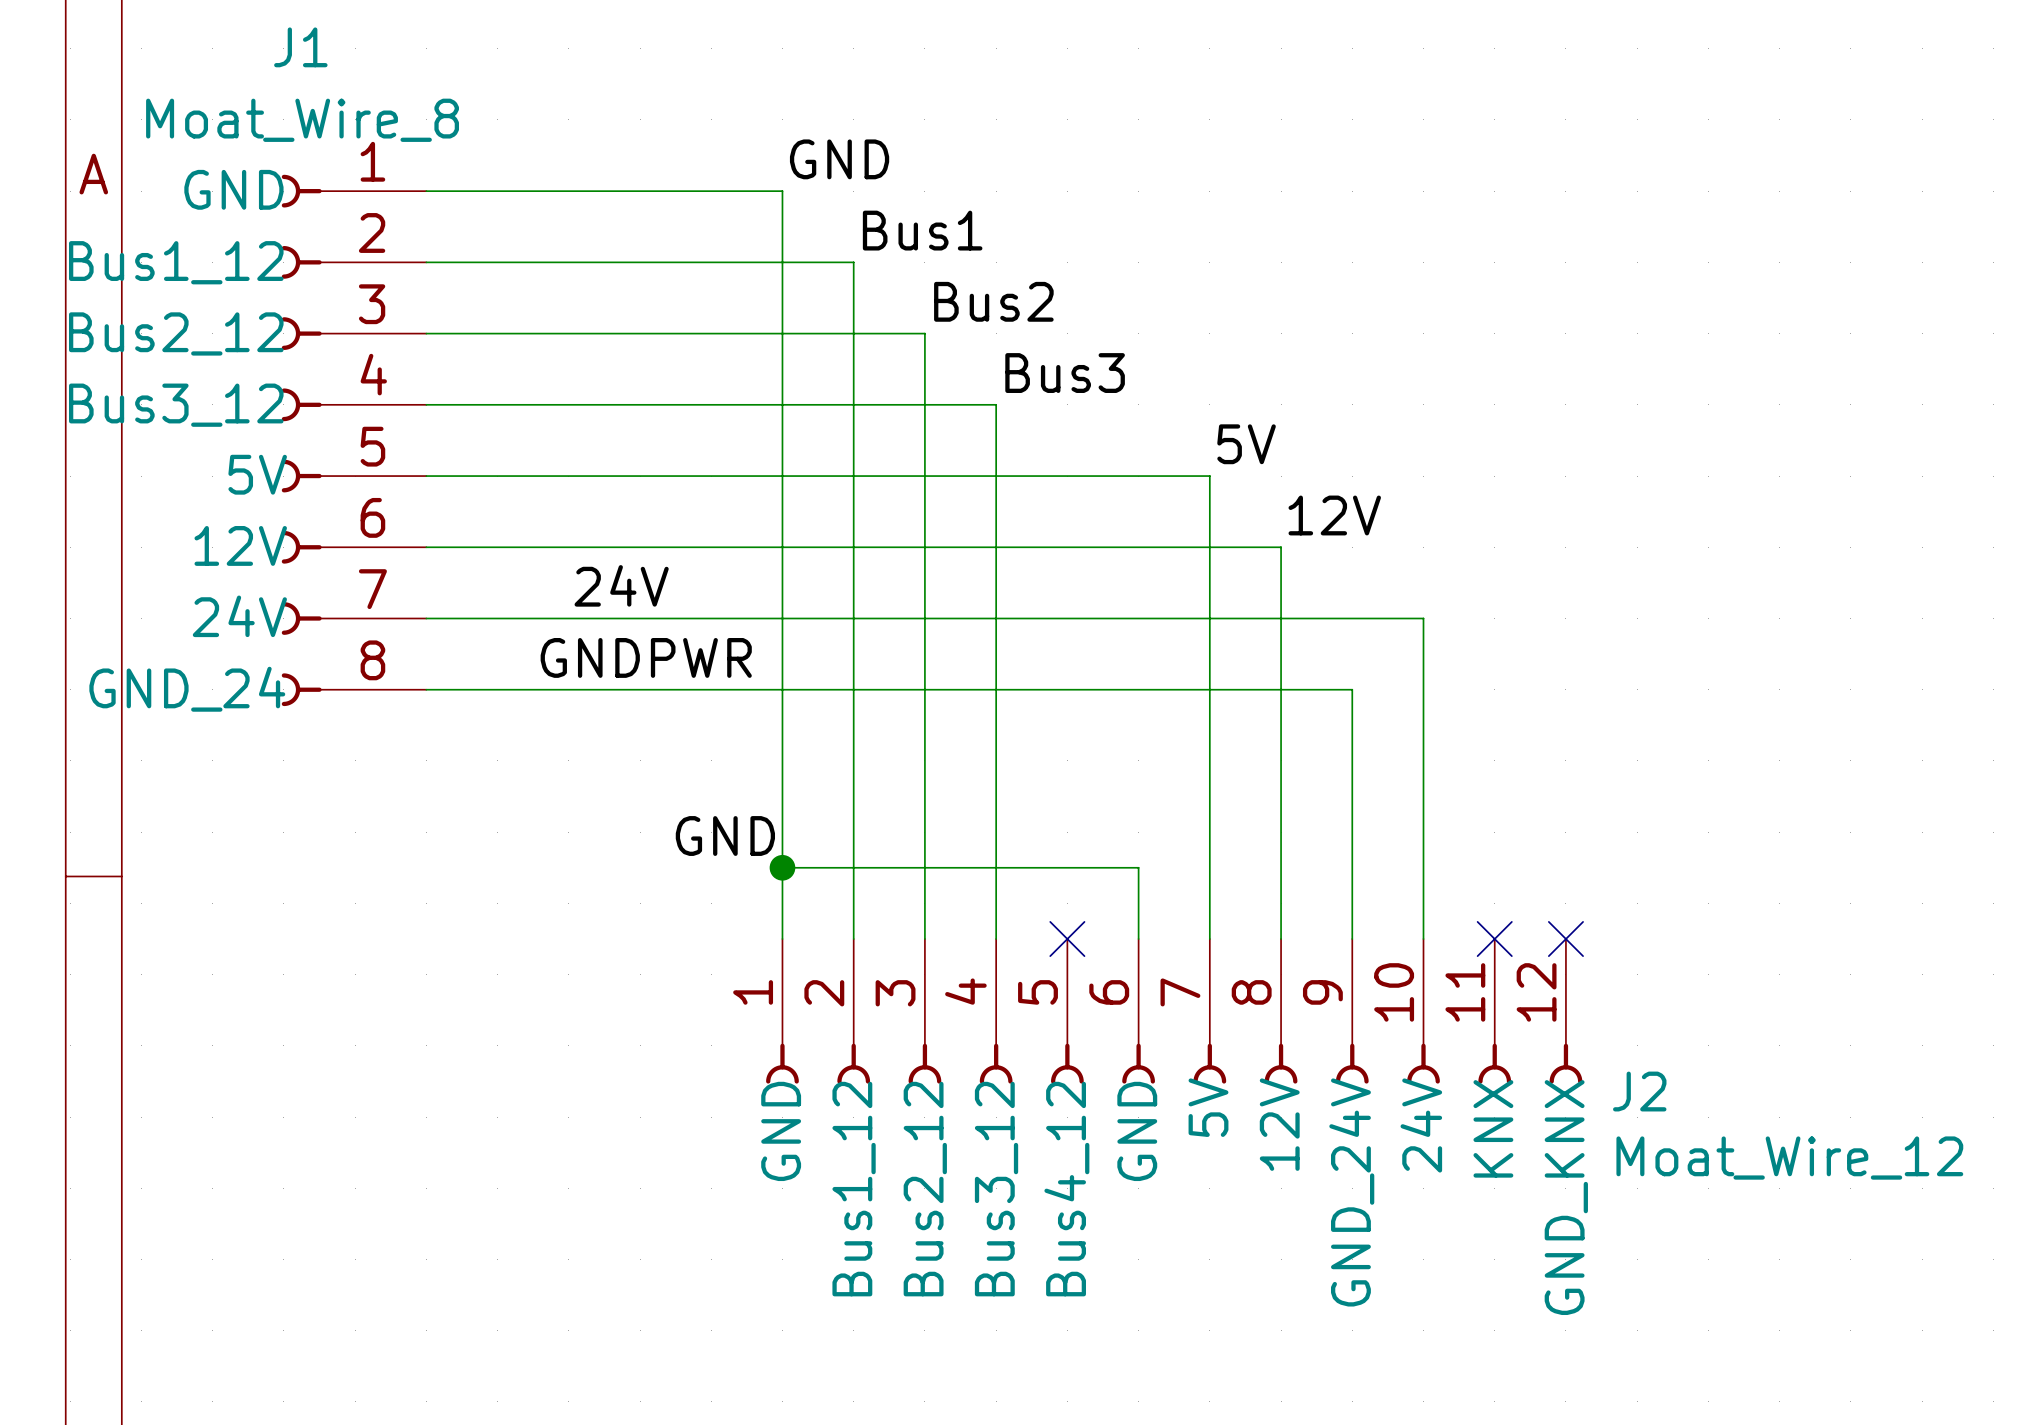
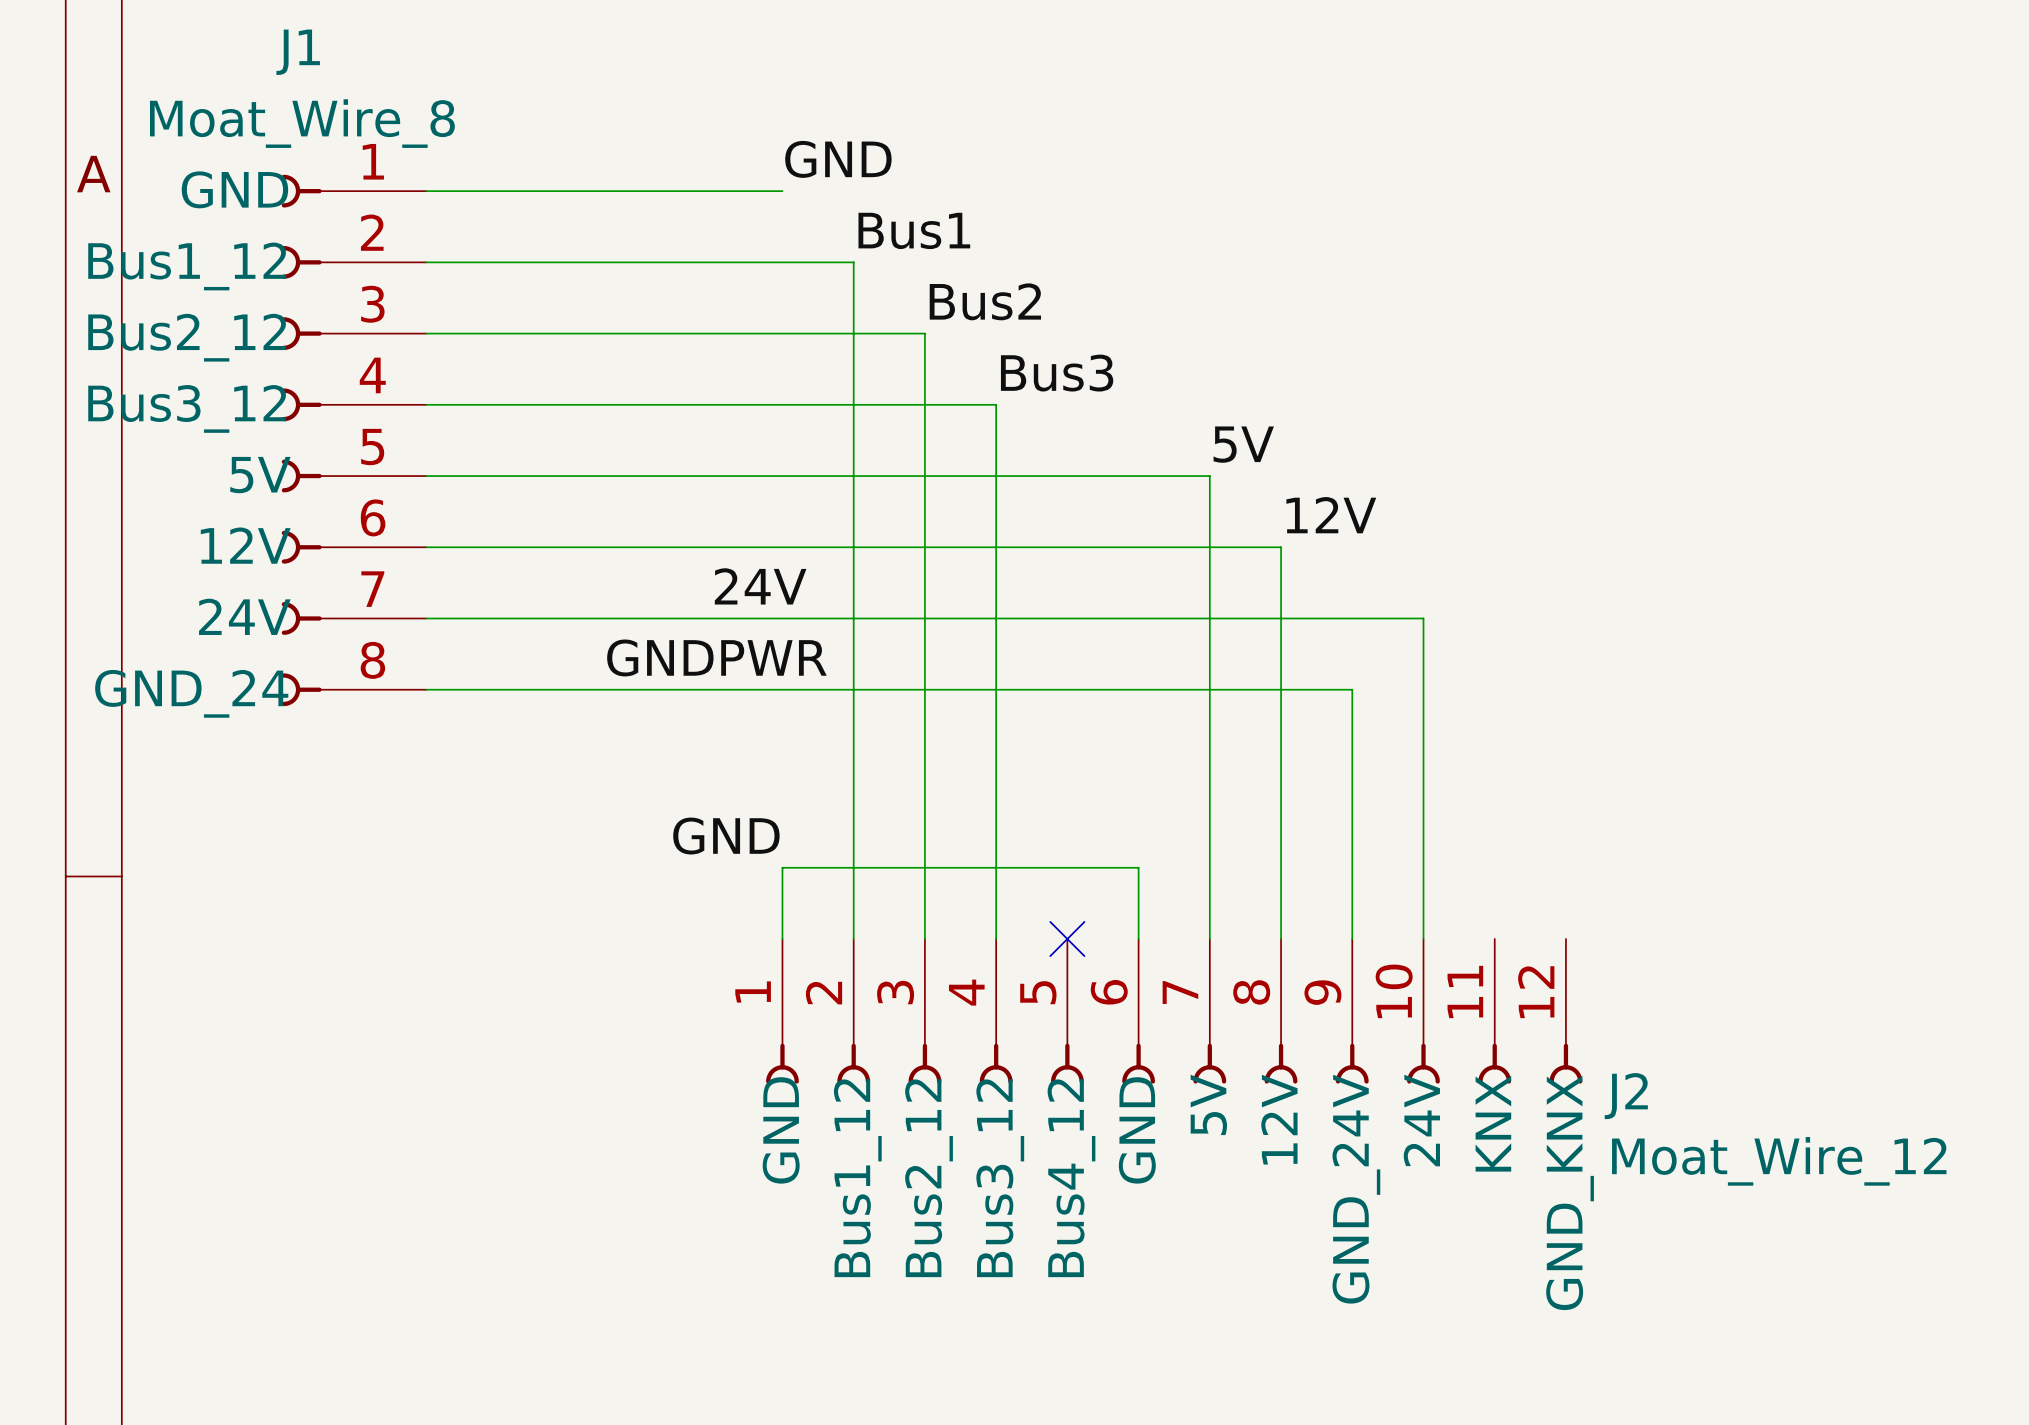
wire: (782, 191) (782, 867) -> none
label position: 24V (621, 585) -> 24V (760, 586)
label position: GNDPWR (646, 657) -> GNDPWR (716, 657)
junction: (782, 867) -> none
no-connect mark: (1494, 939) -> none
no-connect mark: (1565, 939) -> none

